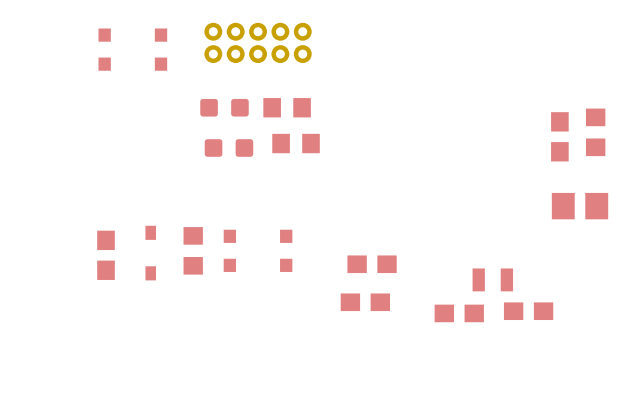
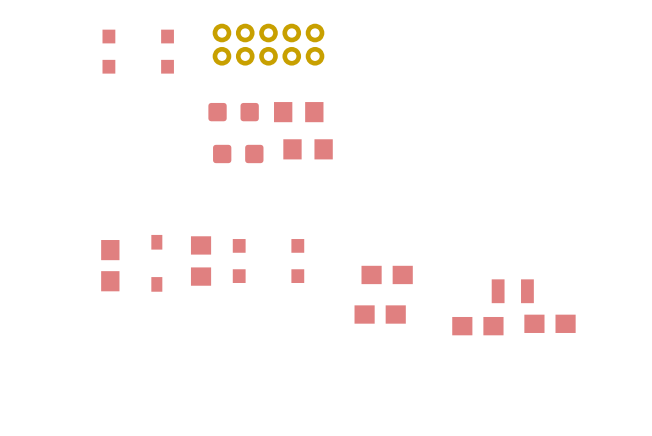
part: (595, 132) -> none
part: (559, 136) -> none
part: (580, 206) -> none

